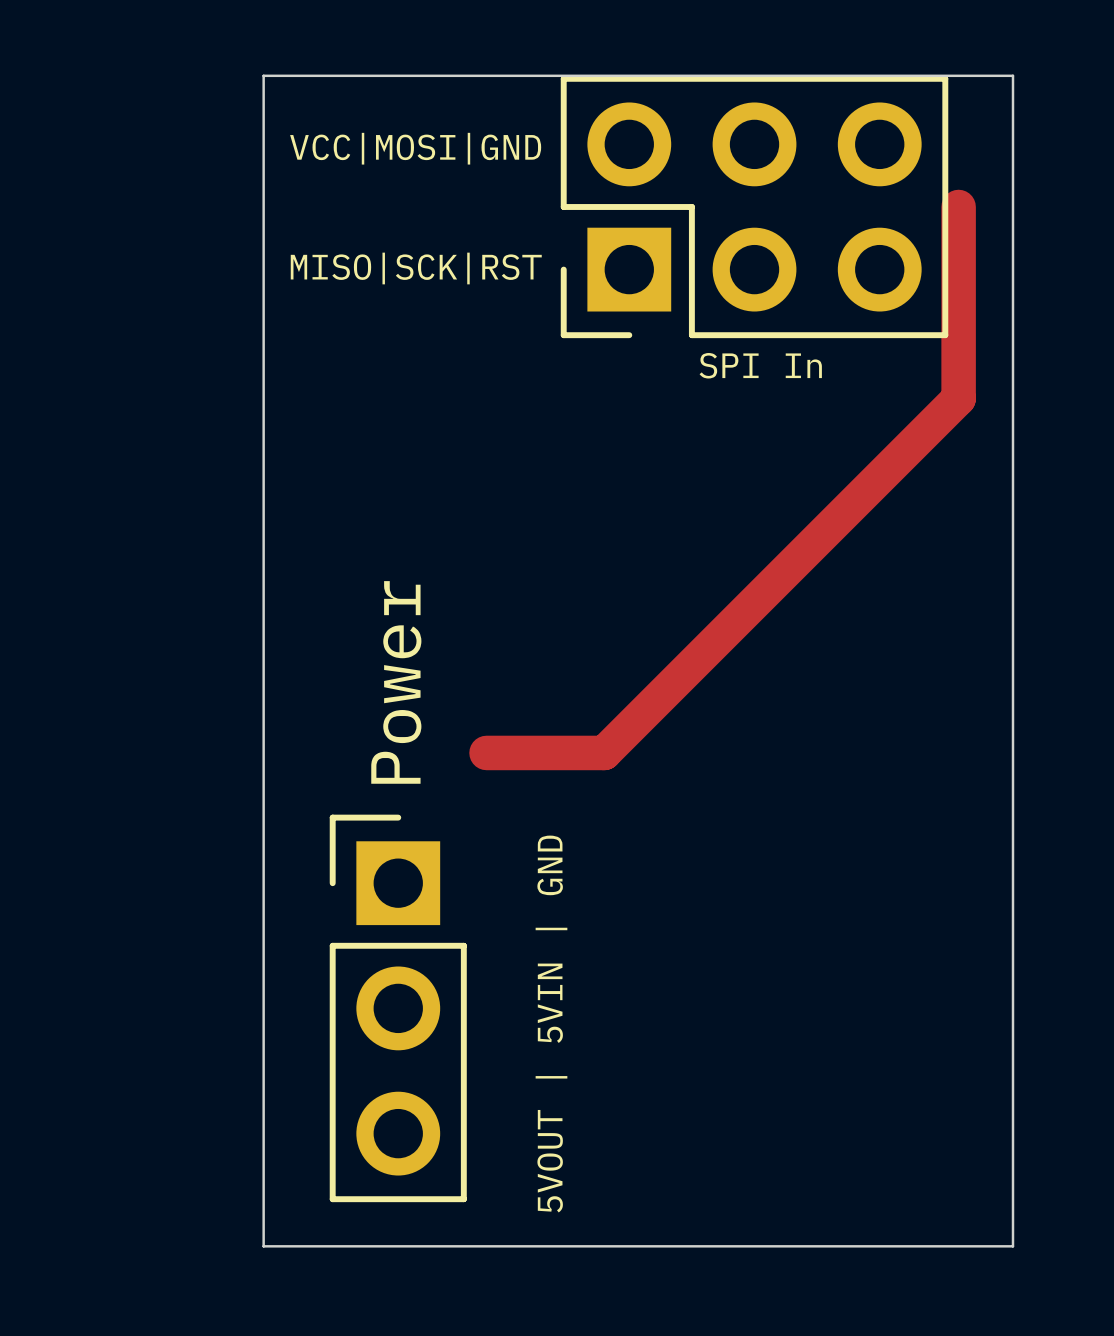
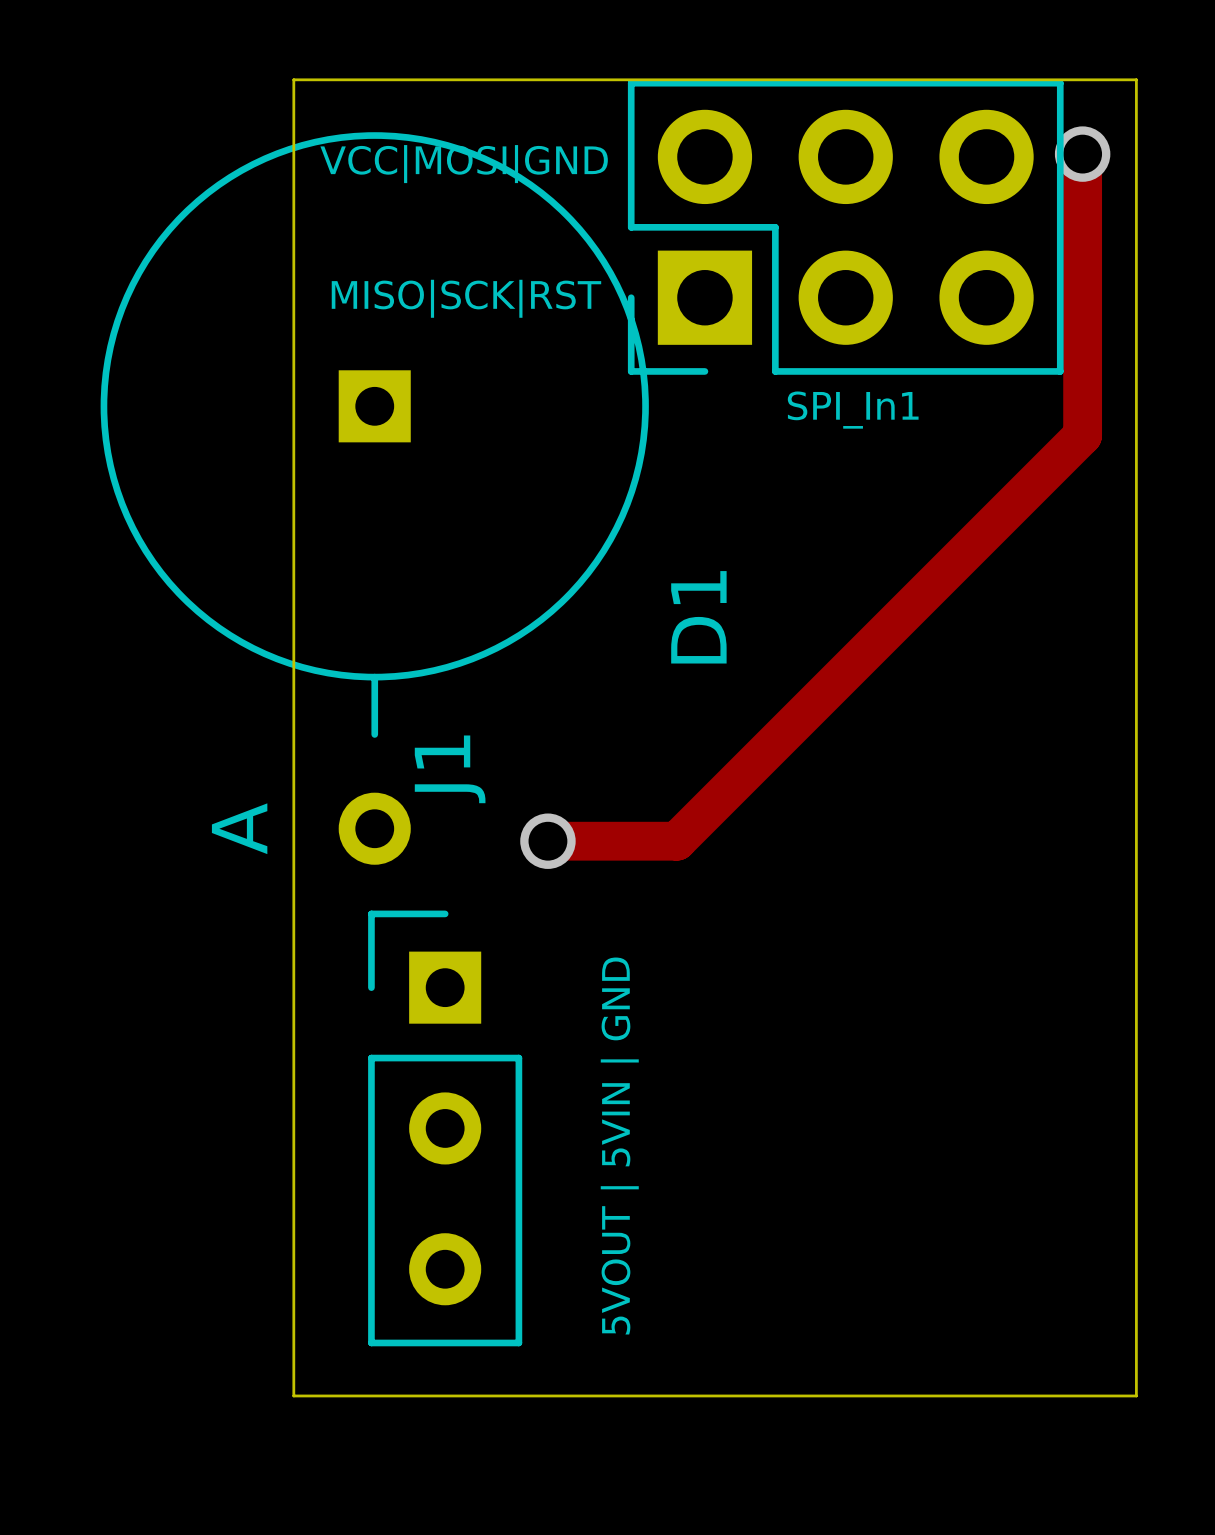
via: none -> (1082, 154)
track: (958, 206) (958, 398) -> (1082, 154) (1082, 435) (1075, 442)
SPI In name: SPI In (760, 365) -> SPI_In1 (853, 410)
D1: none -> (374, 498)
via: none -> (547, 841)
Power: (398, 1008) -> none
J1: none -> (445, 1128)

